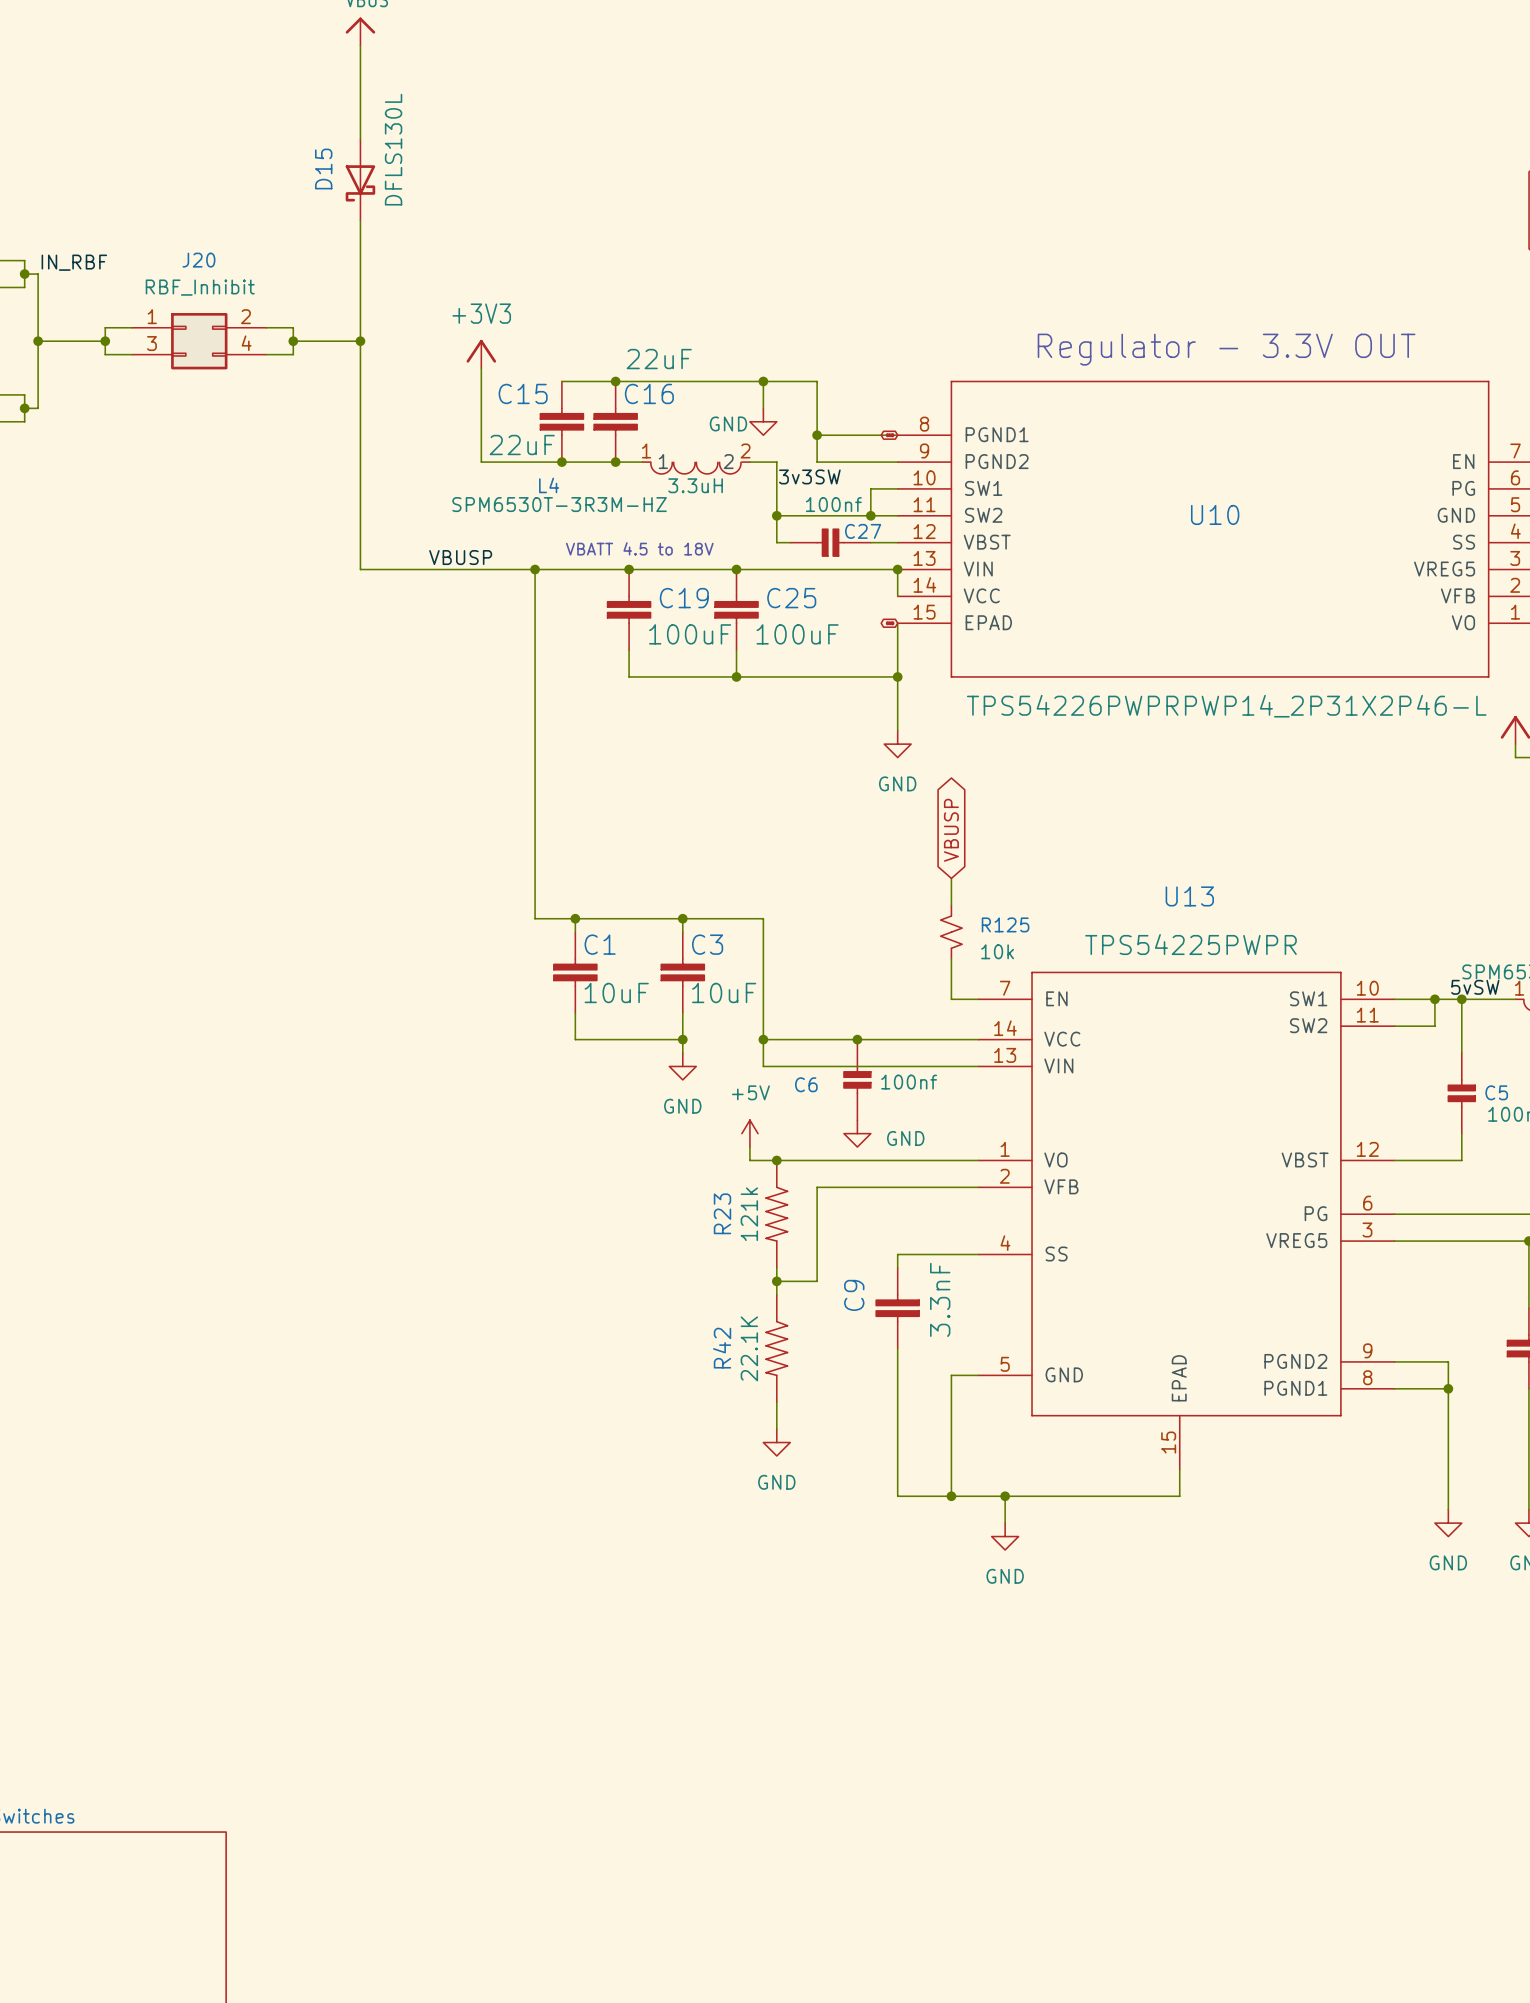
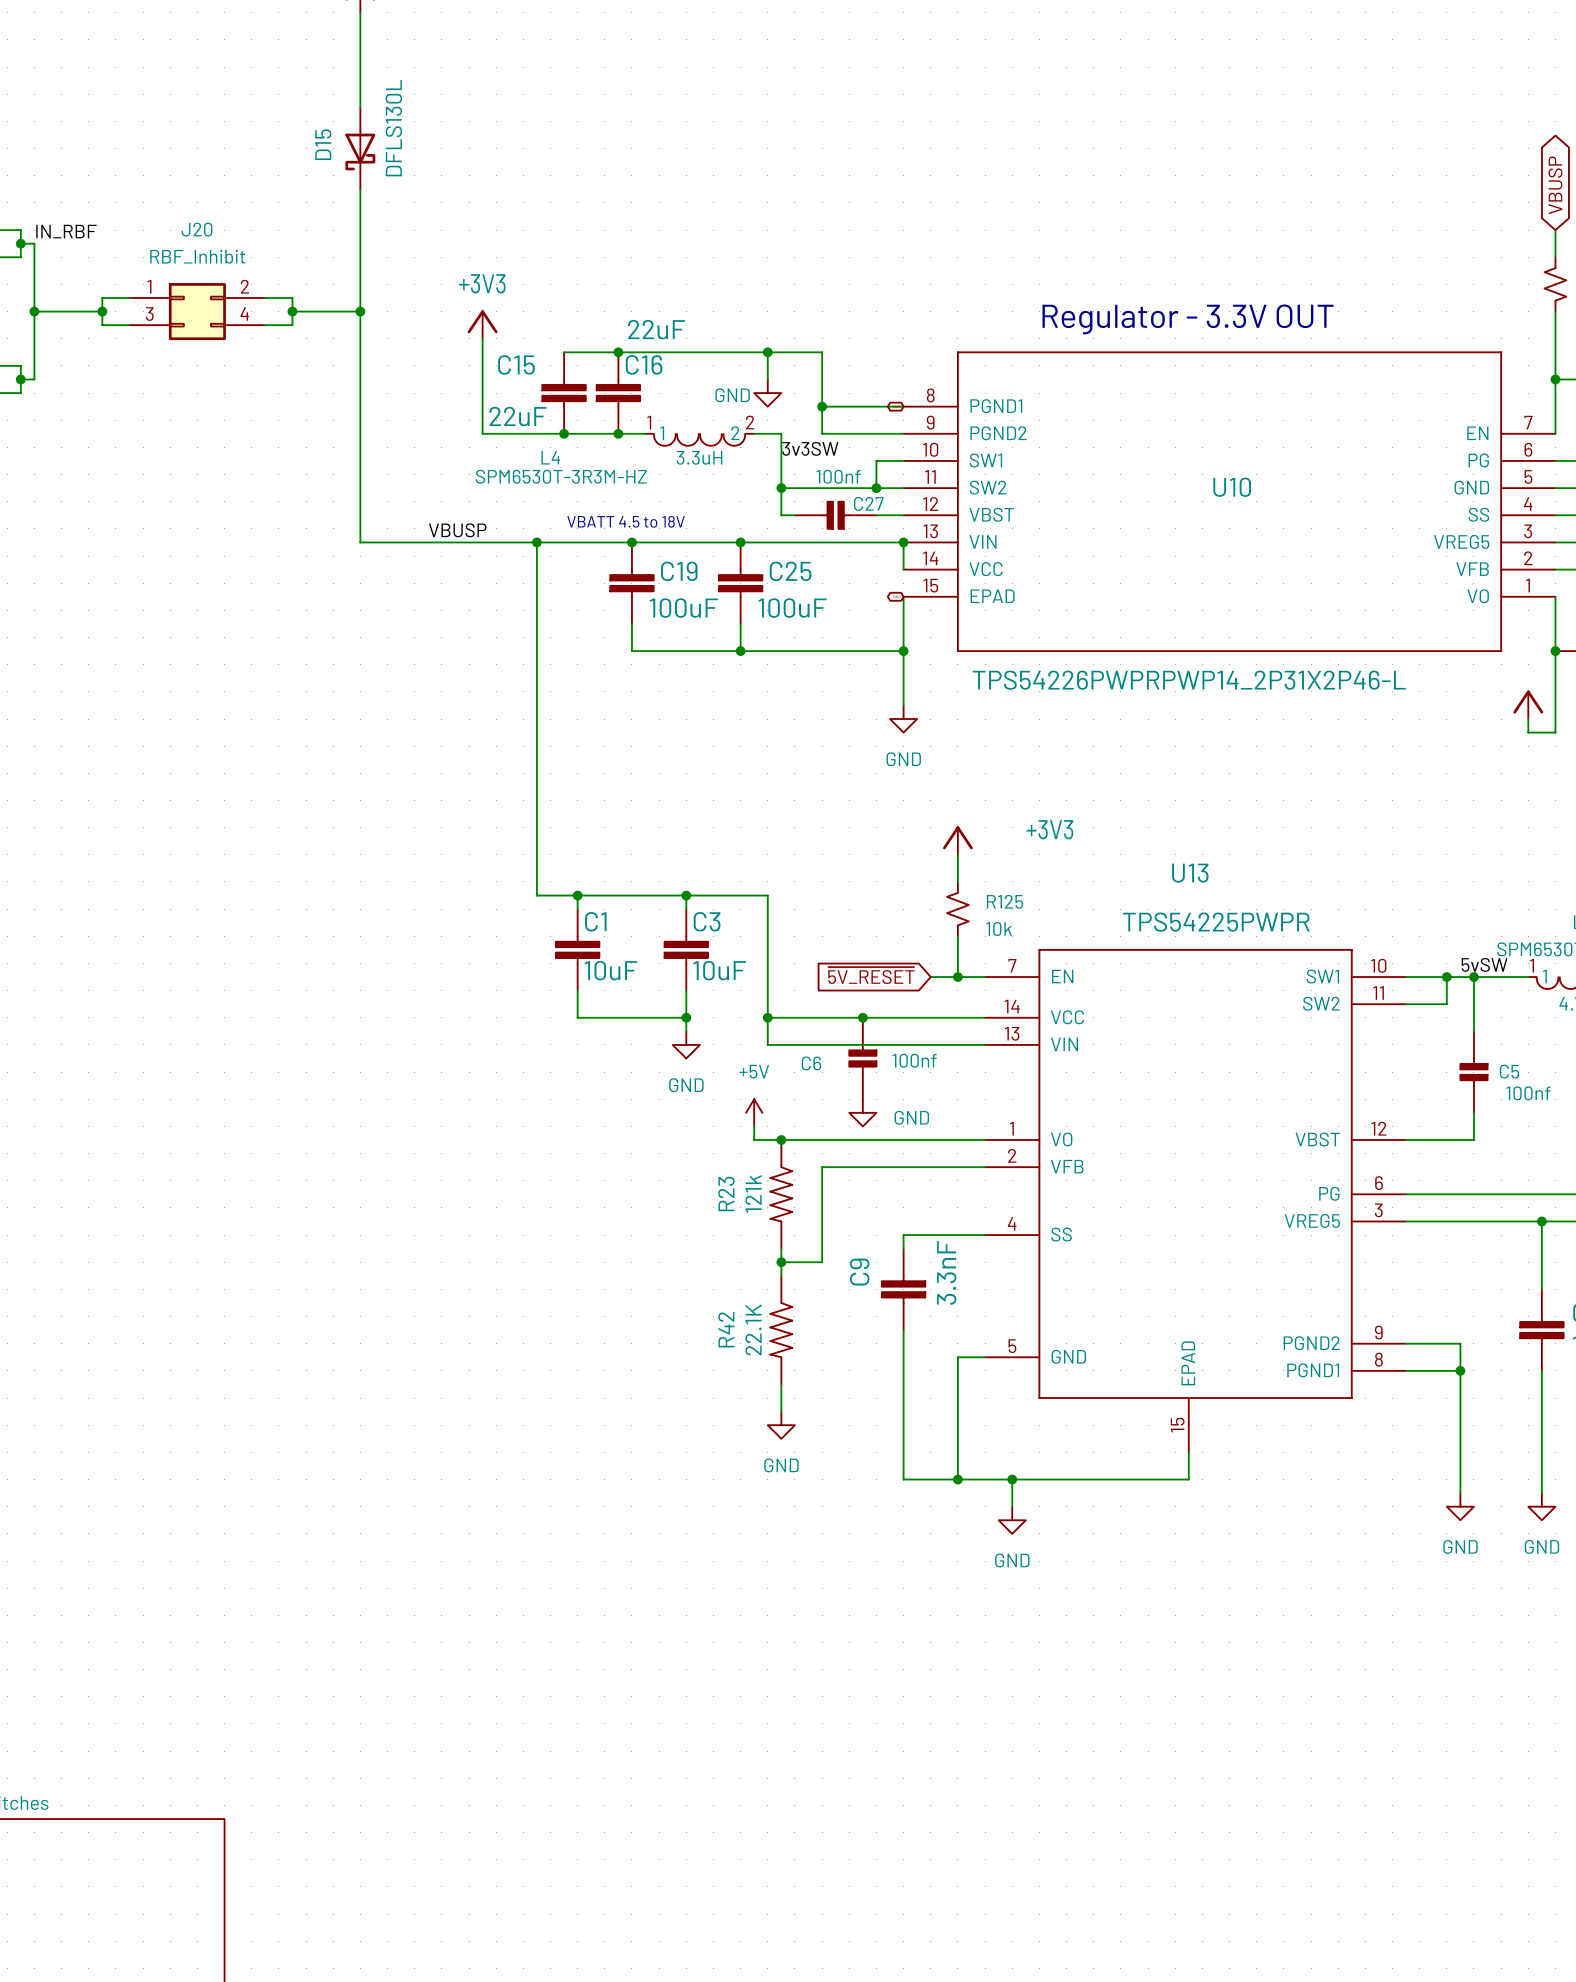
global label: VBUSP (951, 830) -> none
power symbol: none -> +3V3 (957, 840)
global label: none -> ~{5V_RESET} (871, 975)
wire: none -> (930, 977) (957, 977)
junction: none -> (957, 977)

